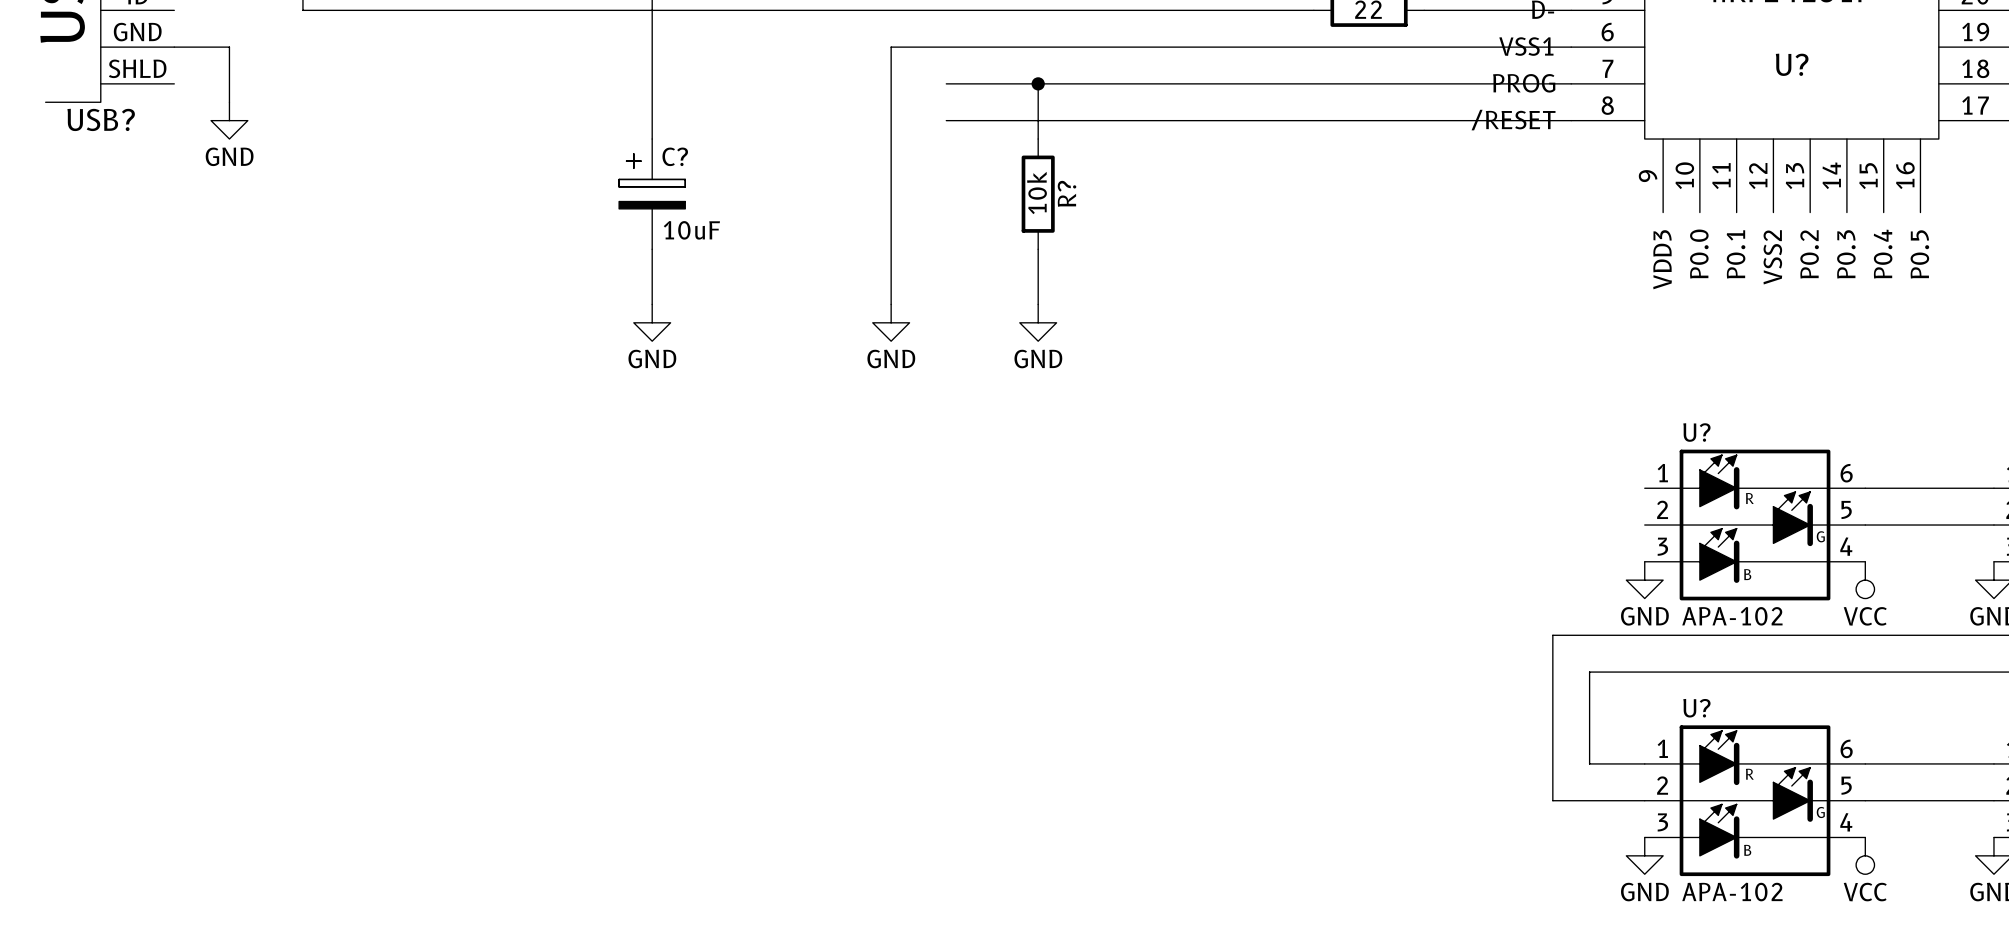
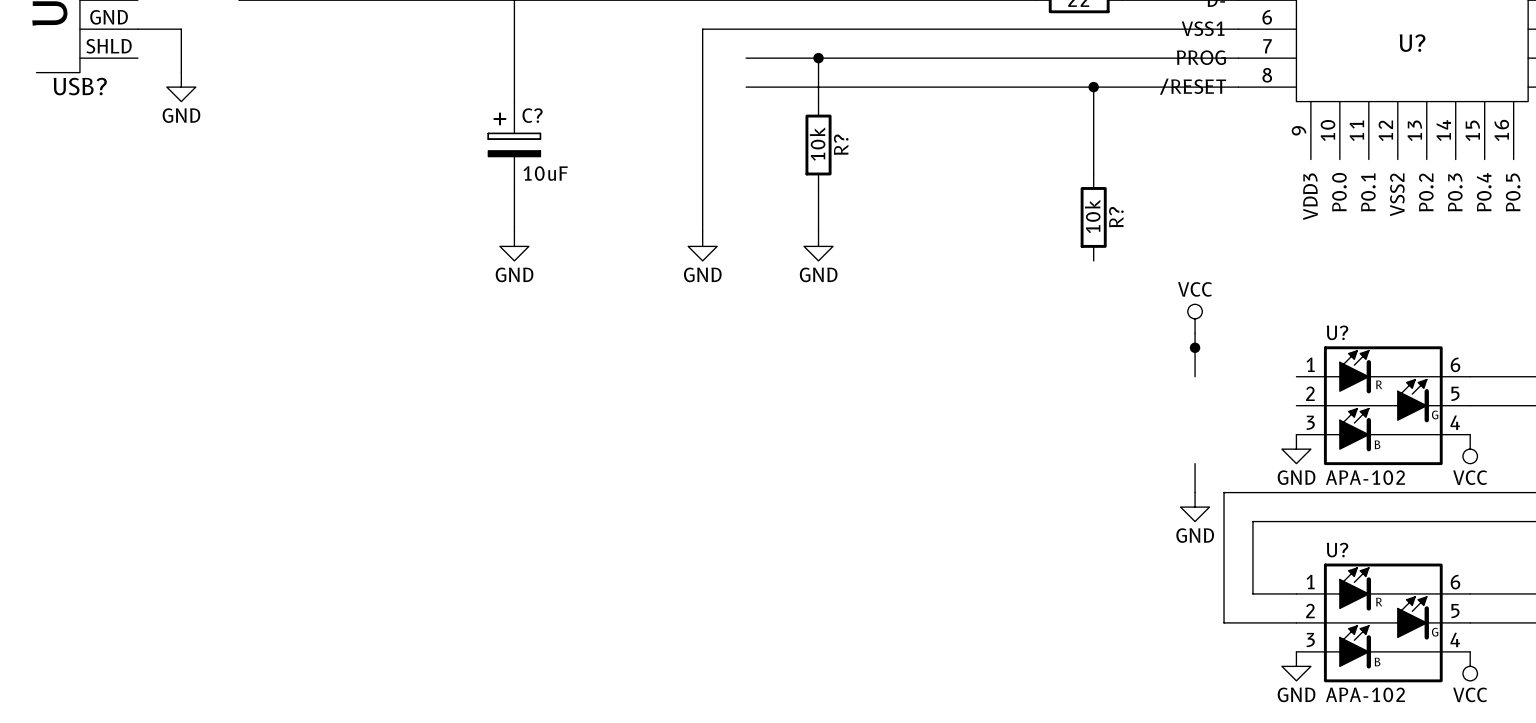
wire: none -> (1093, 87) (1093, 173)
junction: none -> (1093, 87)
R?: none -> 10k (1093, 217)
power symbol: none -> VCC (1195, 318)
wire: none -> (1195, 333) (1195, 376)
junction: none -> (1195, 347)
wire: none -> (1195, 463) (1195, 492)
power symbol: none -> GND (1195, 507)

